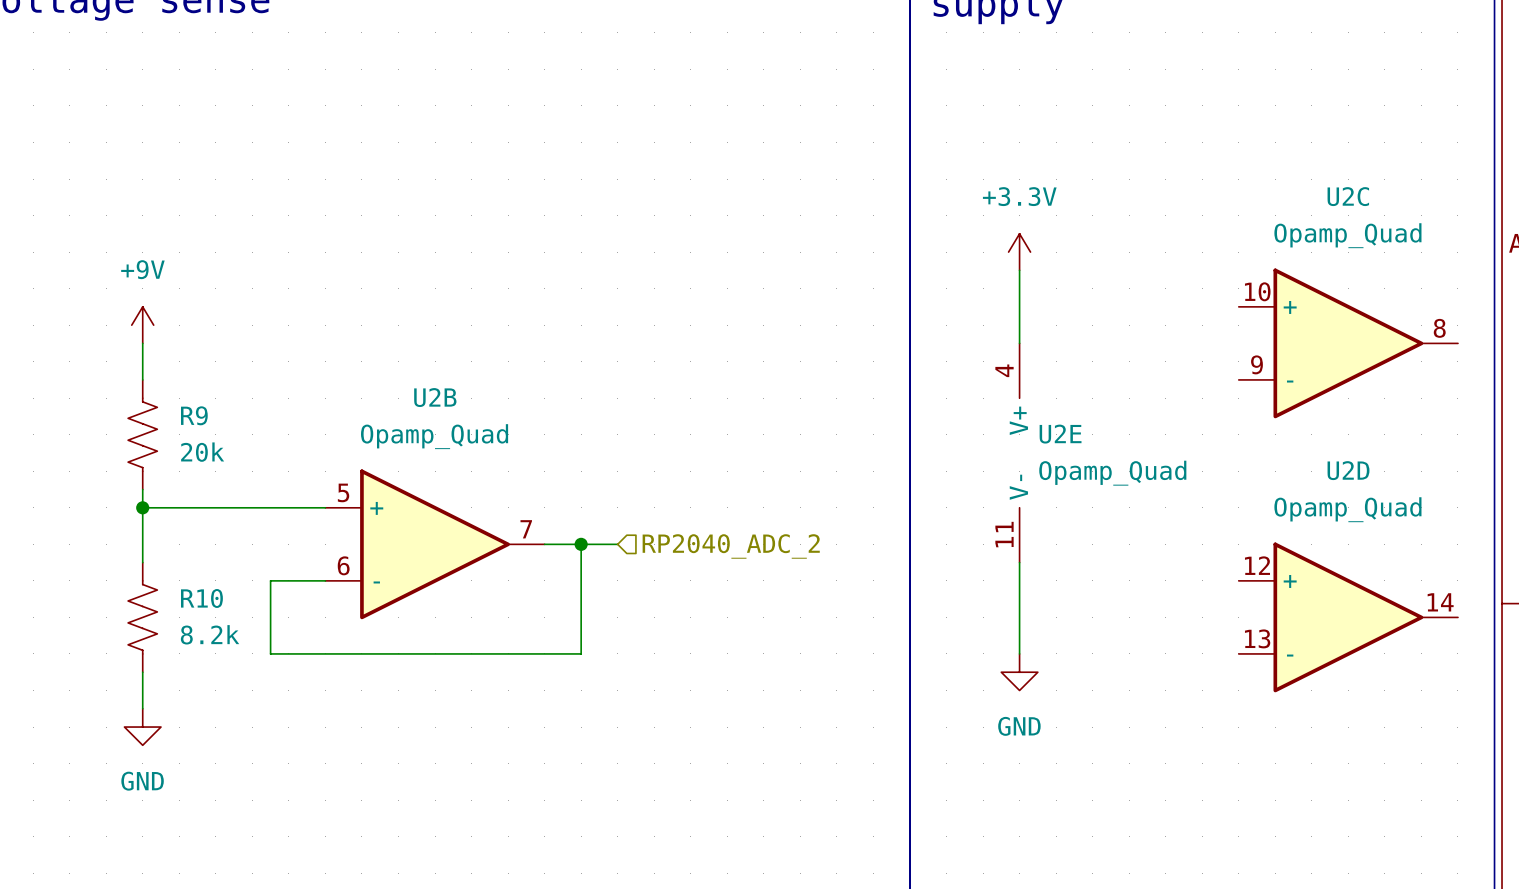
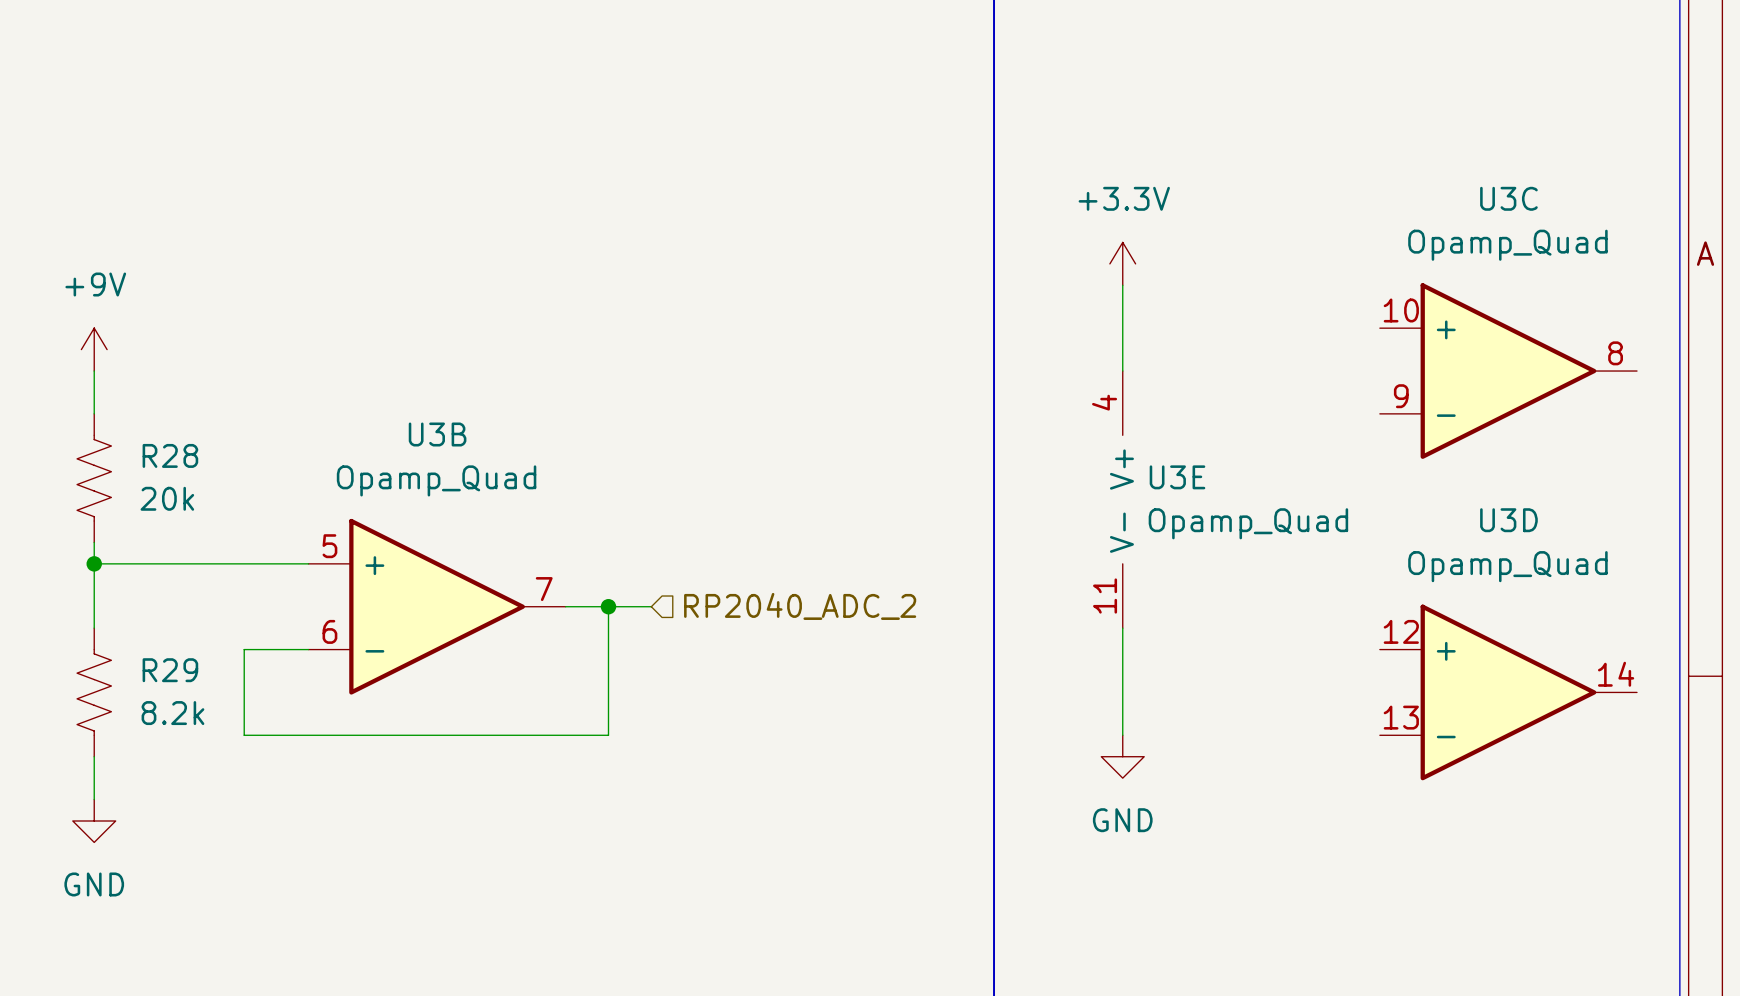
U2C name: U2C (1348, 196) -> U3C (1508, 198)
U2B name: U2B (435, 397) -> U3B (437, 434)
R9 name: R9 (194, 415) -> R28 (170, 455)
U2E name: U2E (1060, 434) -> U3E (1177, 477)
U2D name: U2D (1348, 470) -> U3D (1508, 520)
R10 name: R10 (201, 598) -> R29 (170, 670)

